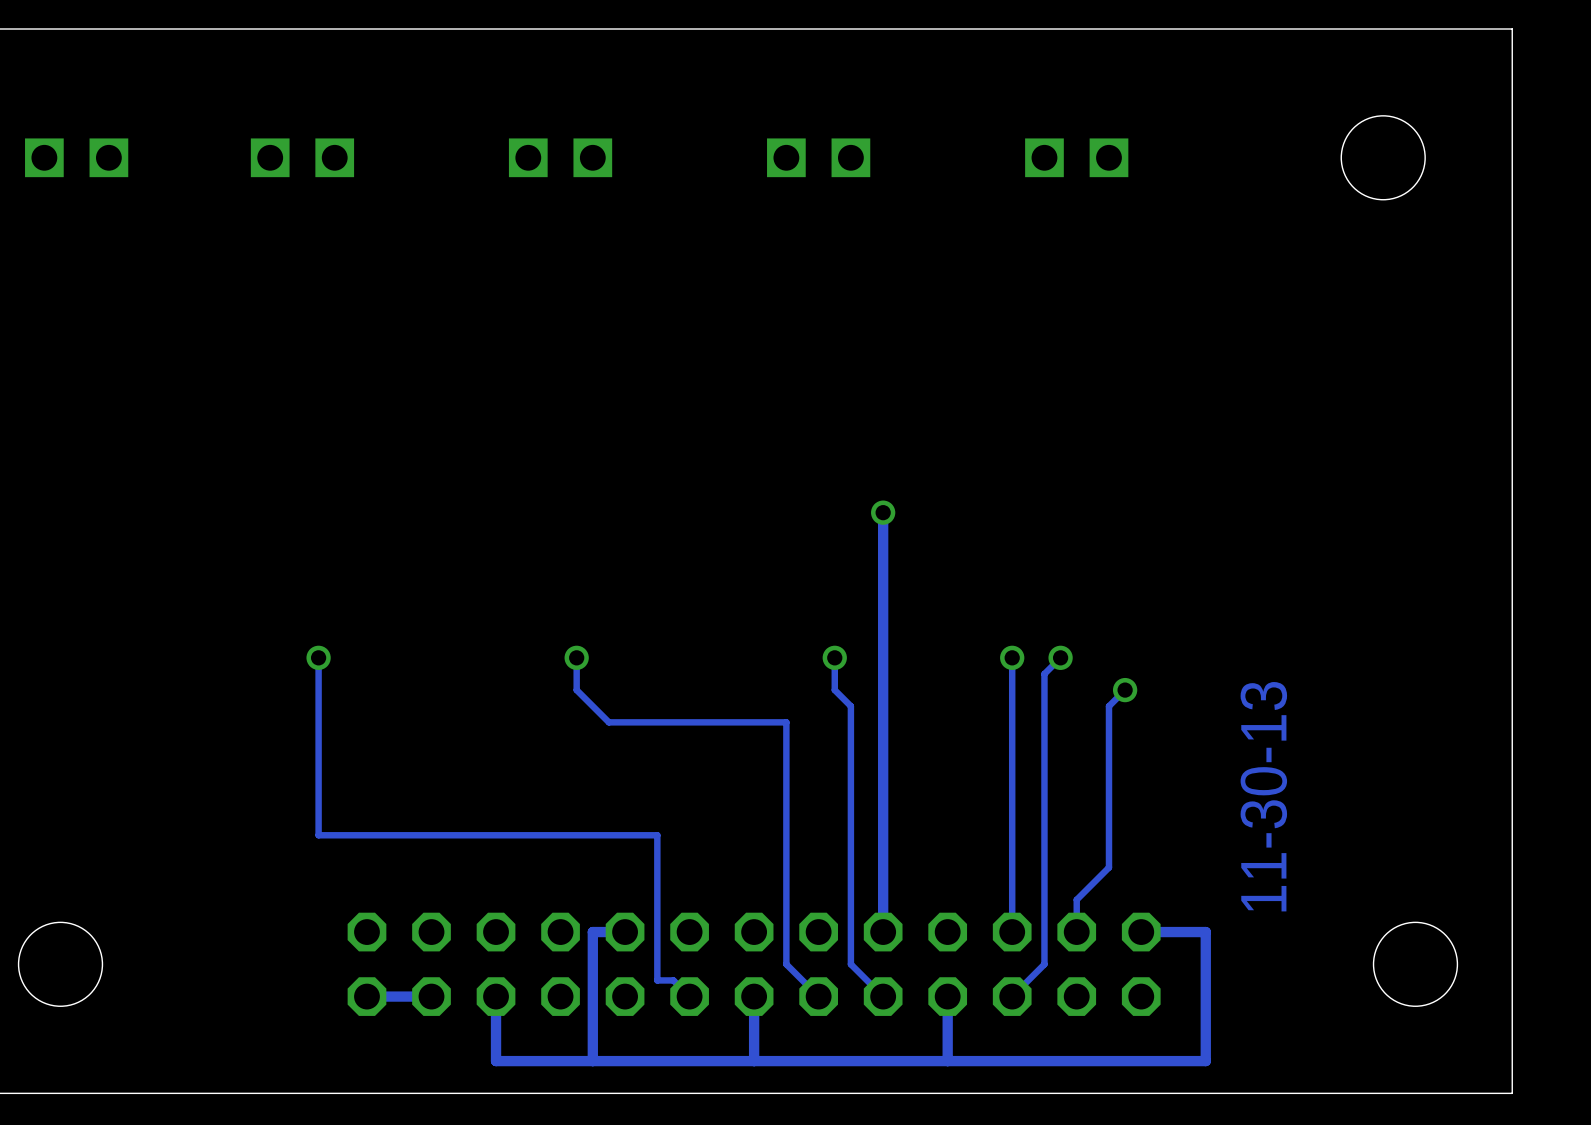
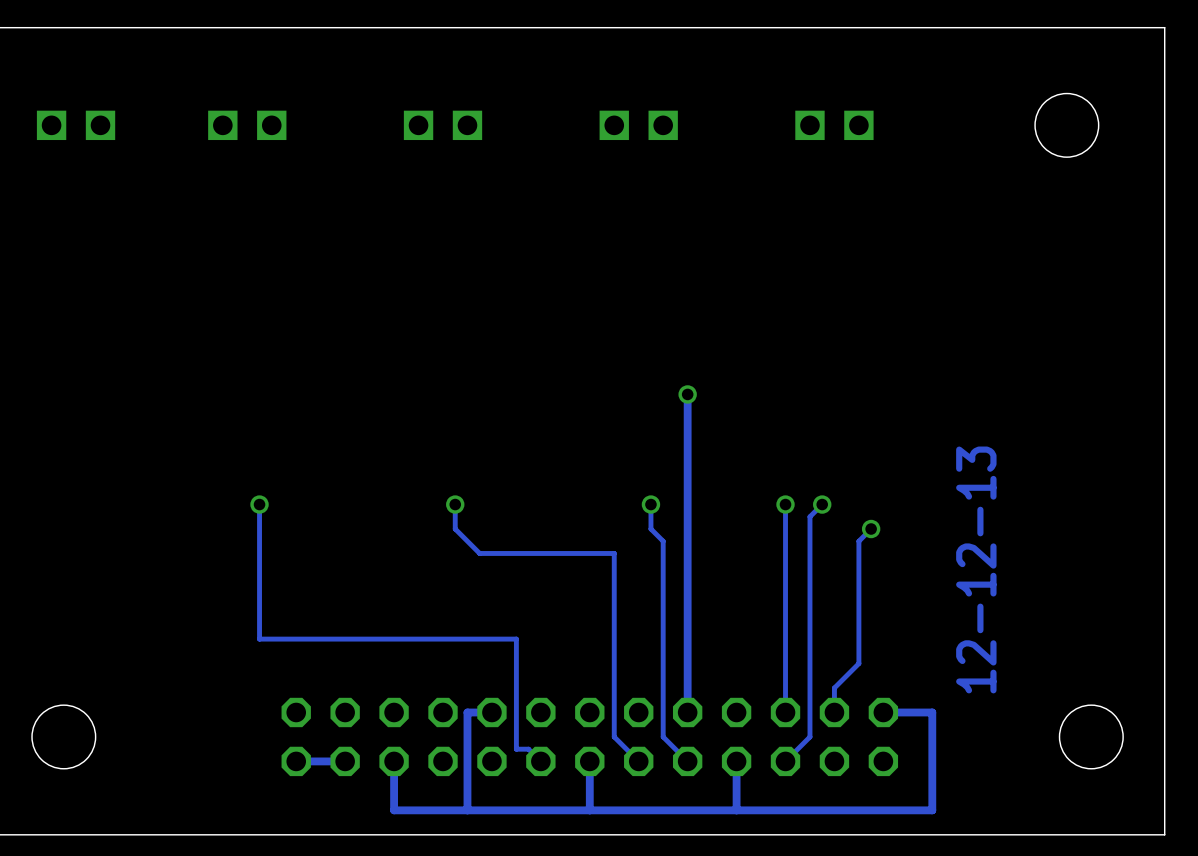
text: 11-30-13 (1263, 796) -> 12-12-13 (976, 569)

